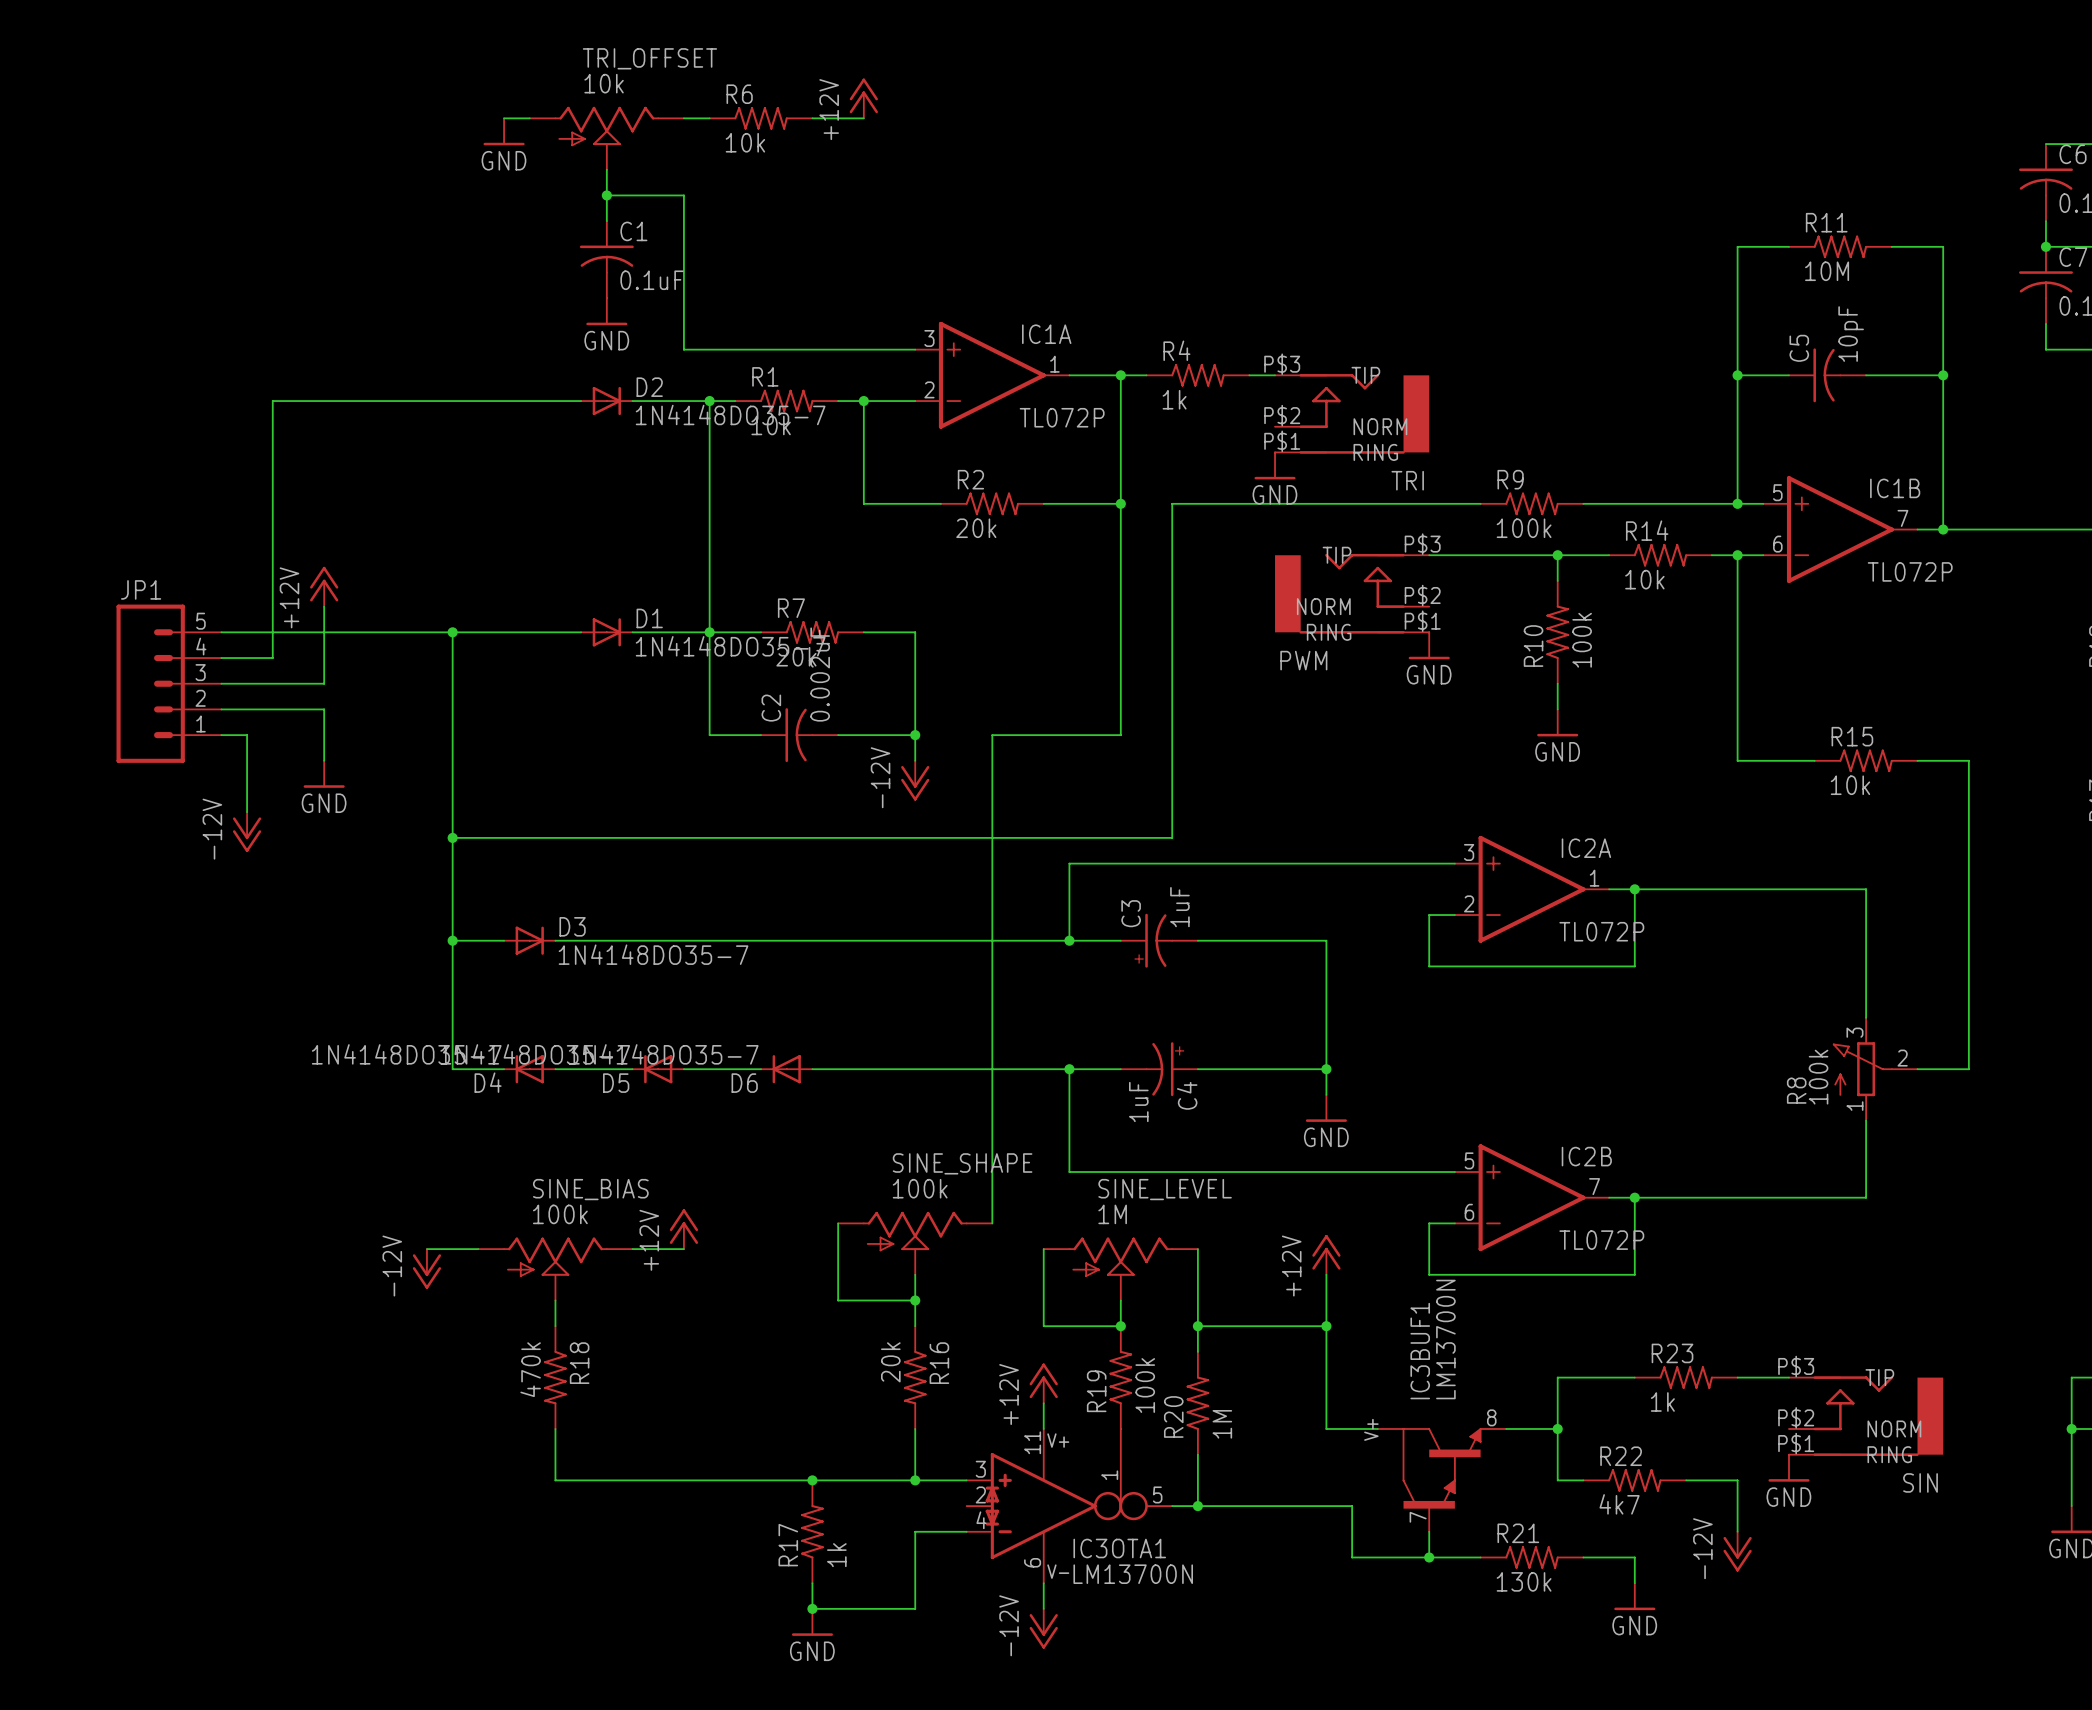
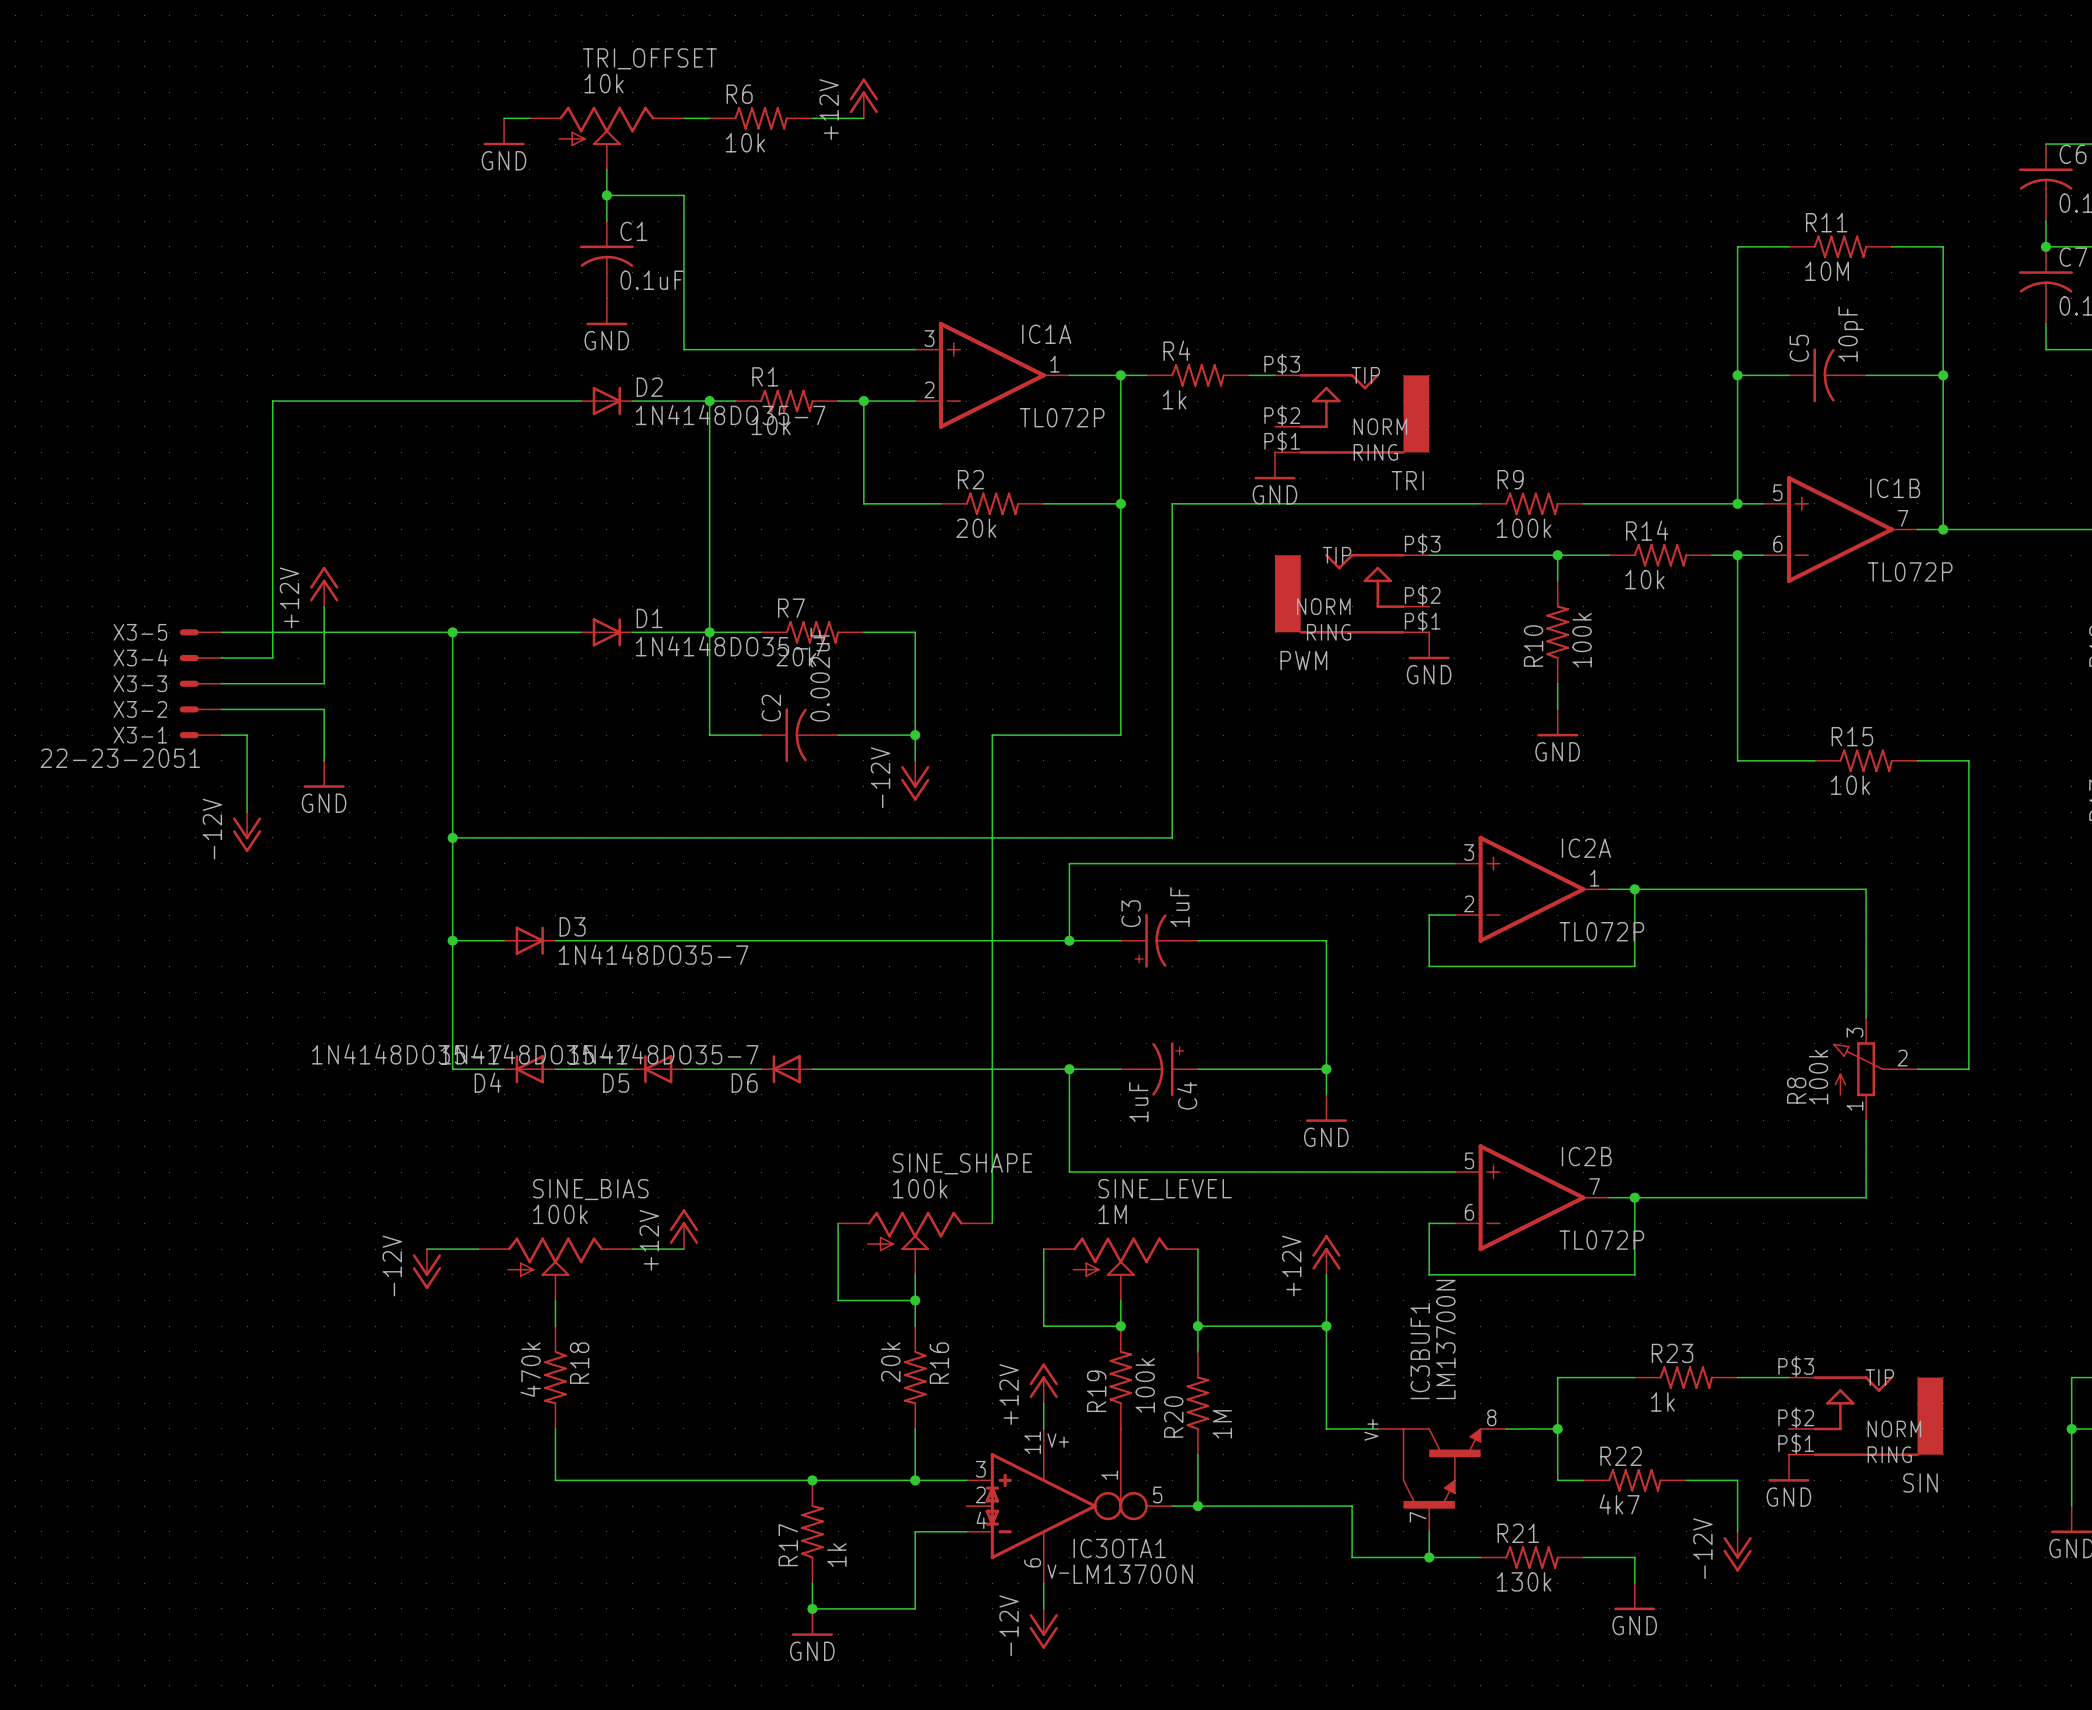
X3-5: none -> (200, 632)
X3-4: none -> (200, 658)
JP1: (168, 683) -> none
X3-3: none -> (200, 683)
X3-2: none -> (200, 709)
X3-1: none -> 22-23-2051 (200, 735)

